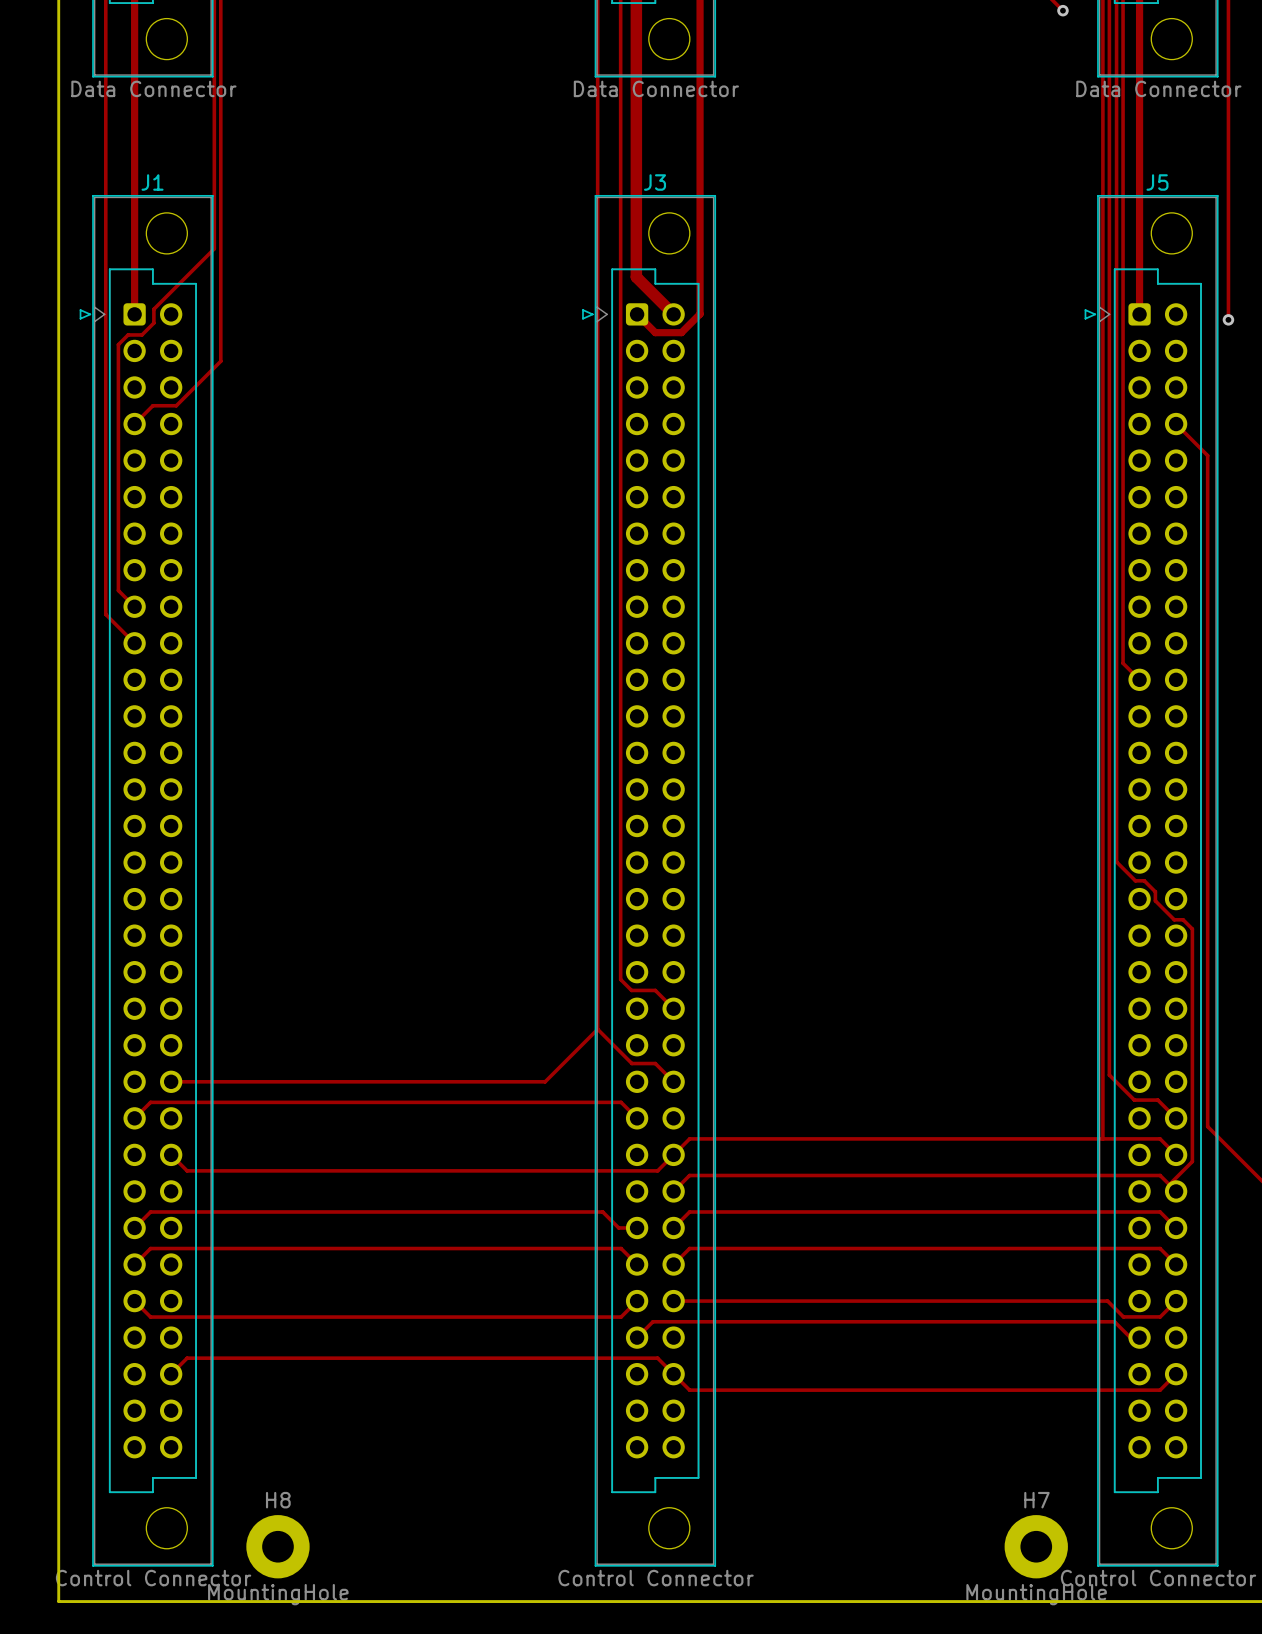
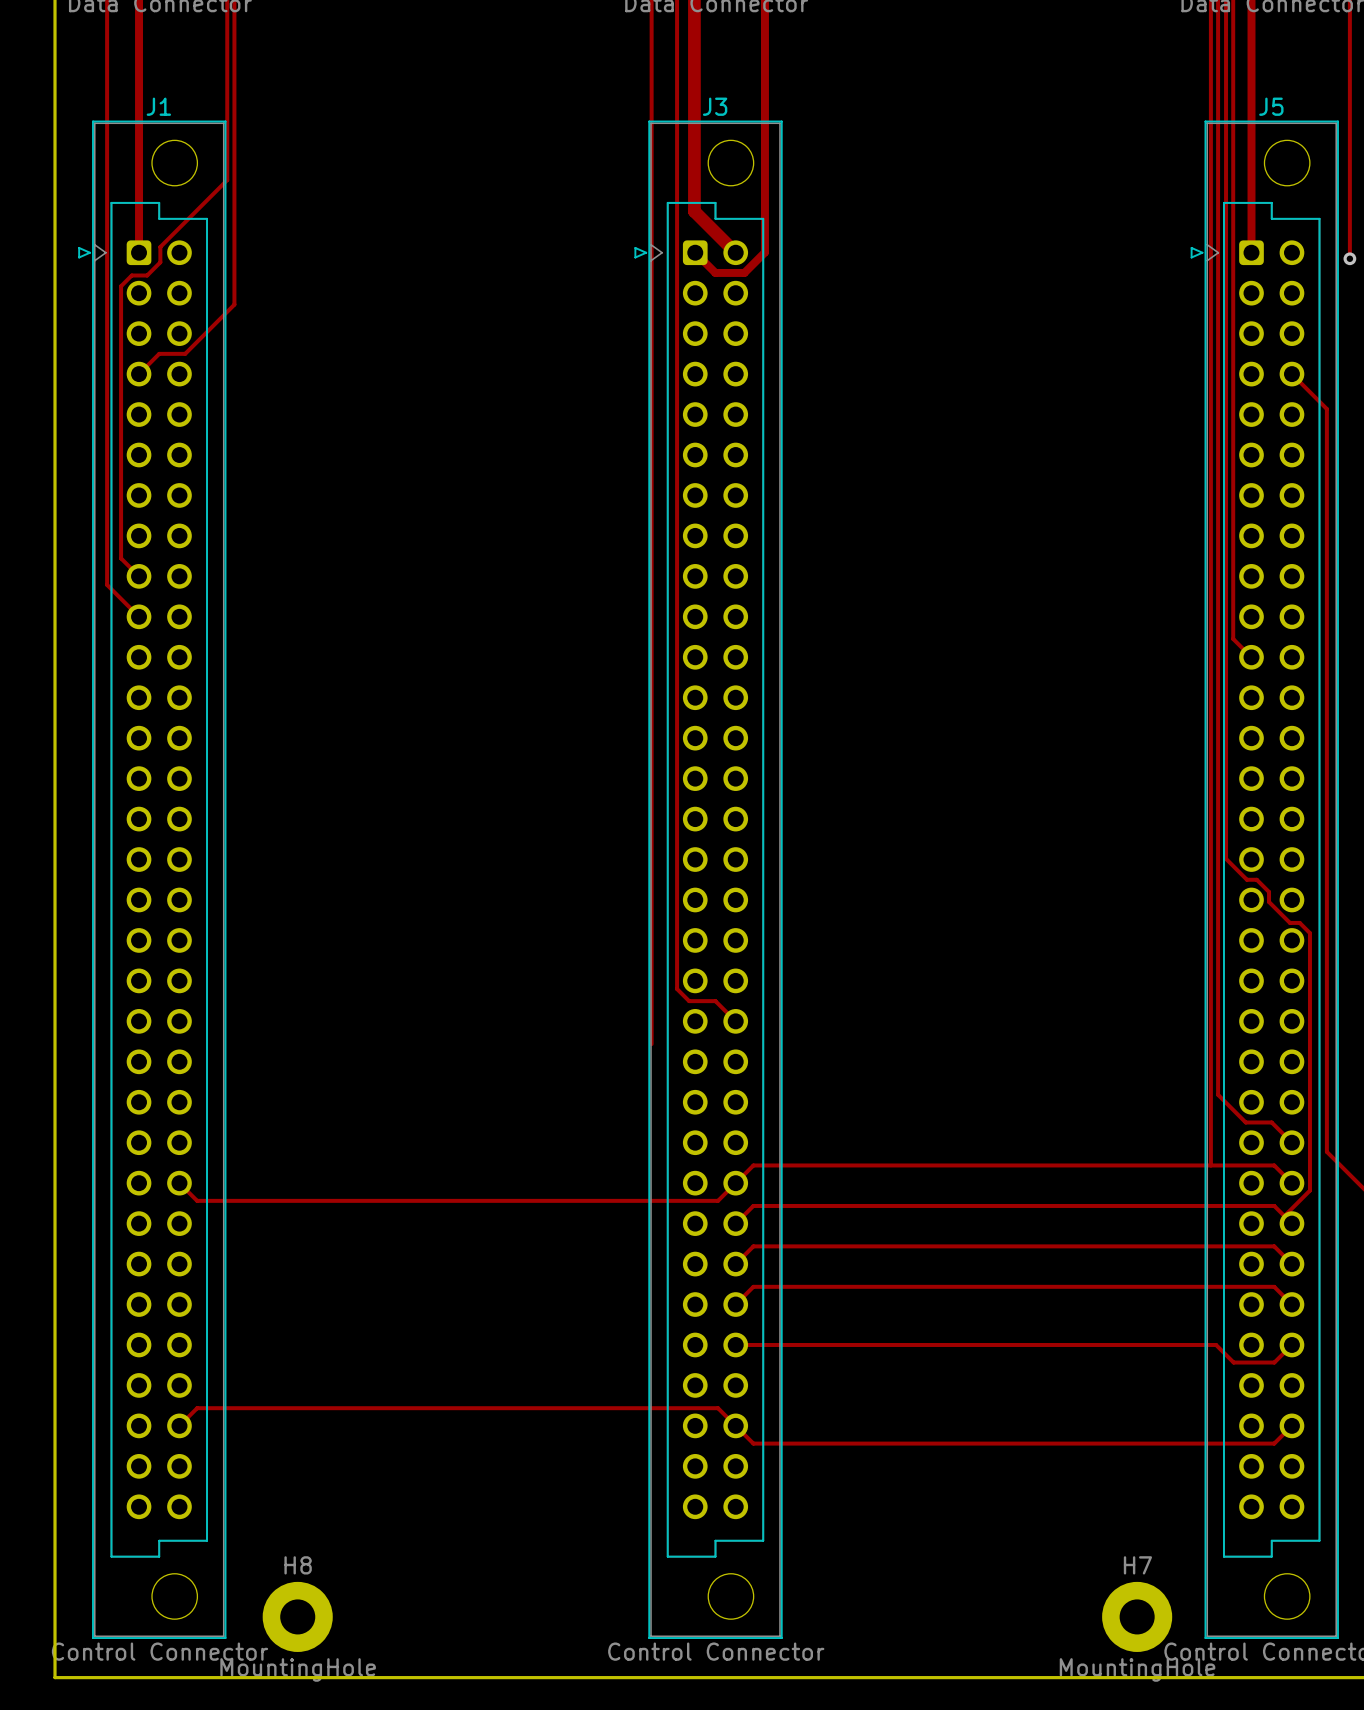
track: (171, 1081) (545, 1081) (597, 1029) (631, 1063) (655, 1063) (673, 1081) -> none
track: (134, 1118) (150, 1102) (621, 1102) (637, 1118) -> none
track: (134, 1227) (150, 1211) (602, 1211) (618, 1227) (637, 1227) -> none
track: (134, 1264) (150, 1248) (621, 1248) (637, 1264) -> none
track: (134, 1301) (150, 1317) (621, 1317) (637, 1301) -> none
track: (637, 1337) (652, 1321) (1114, 1321) (1130, 1337) (1139, 1337) -> none

